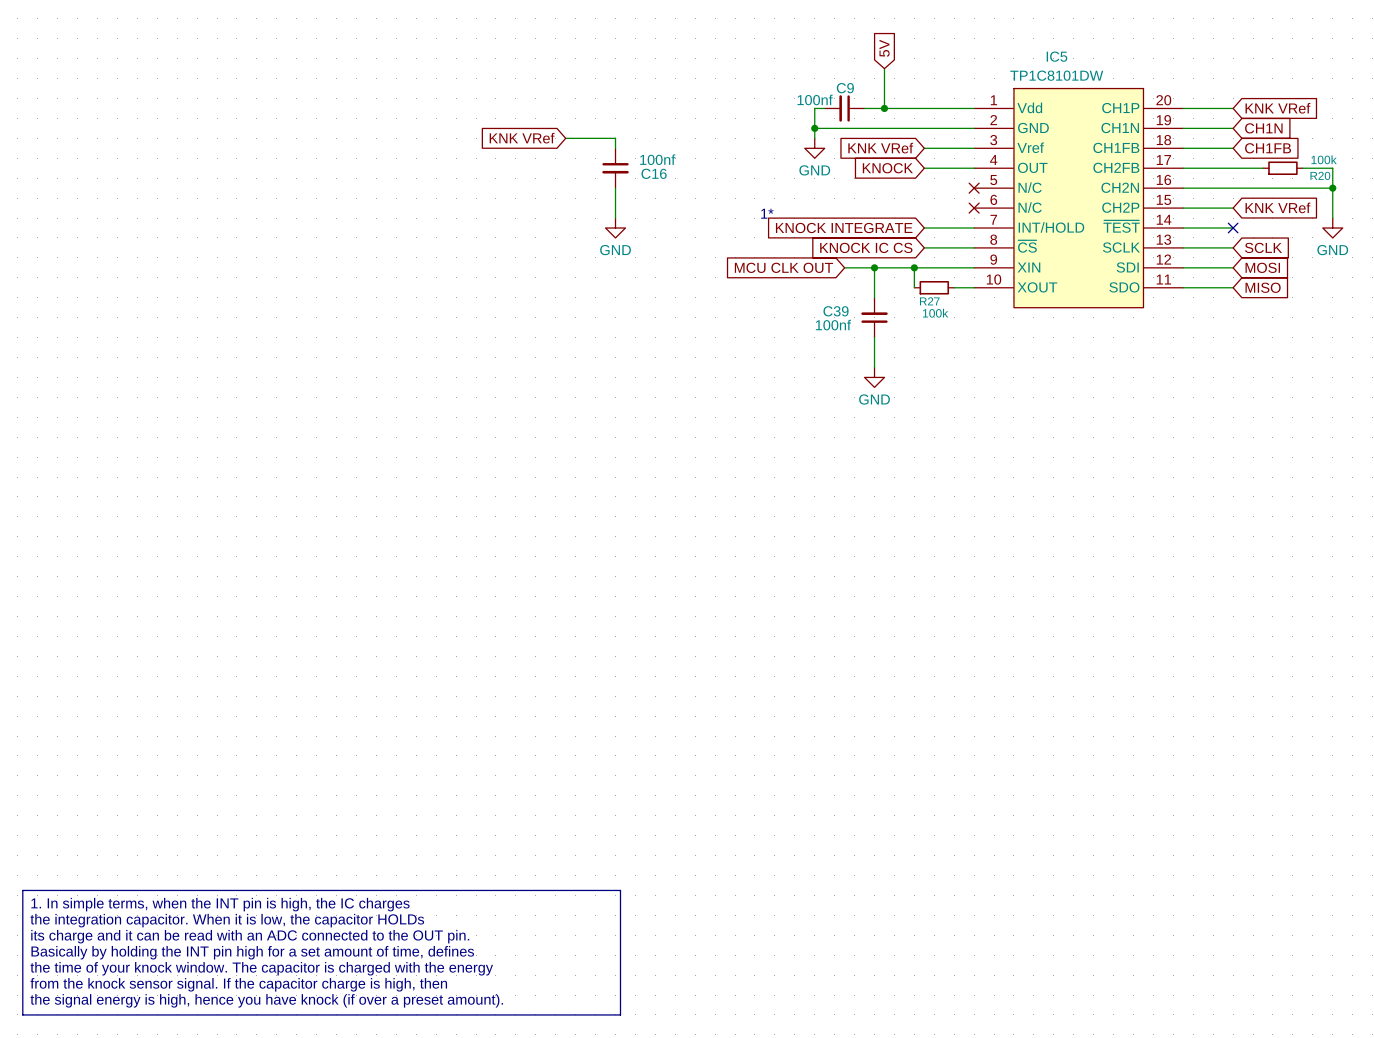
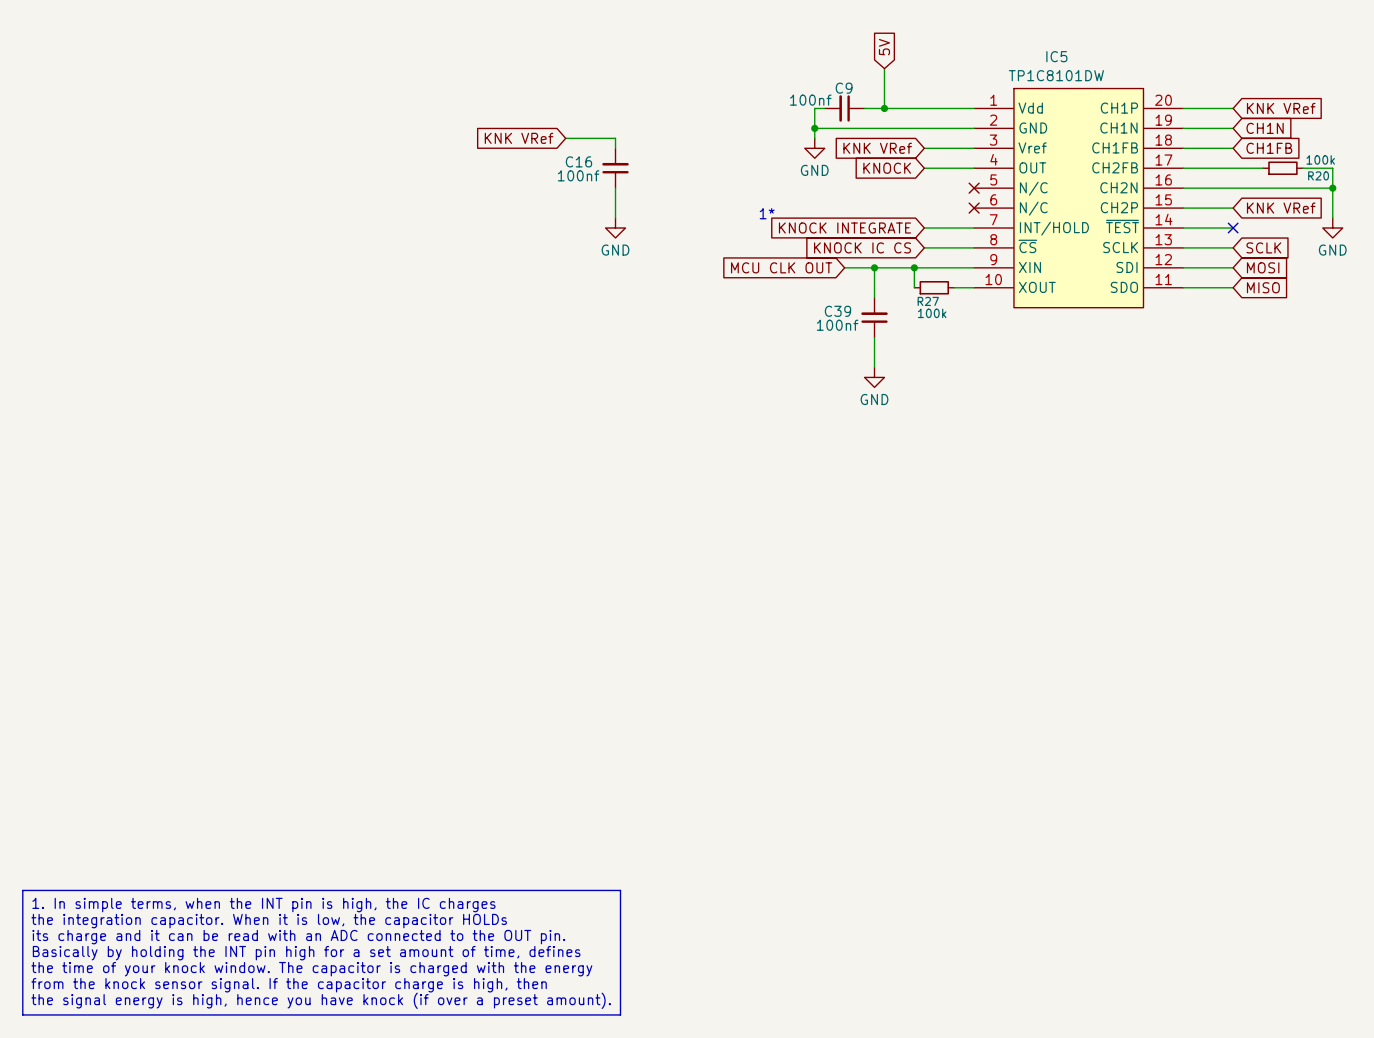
C16 rotation: 0° (615, 168) -> 180° (615, 168)

